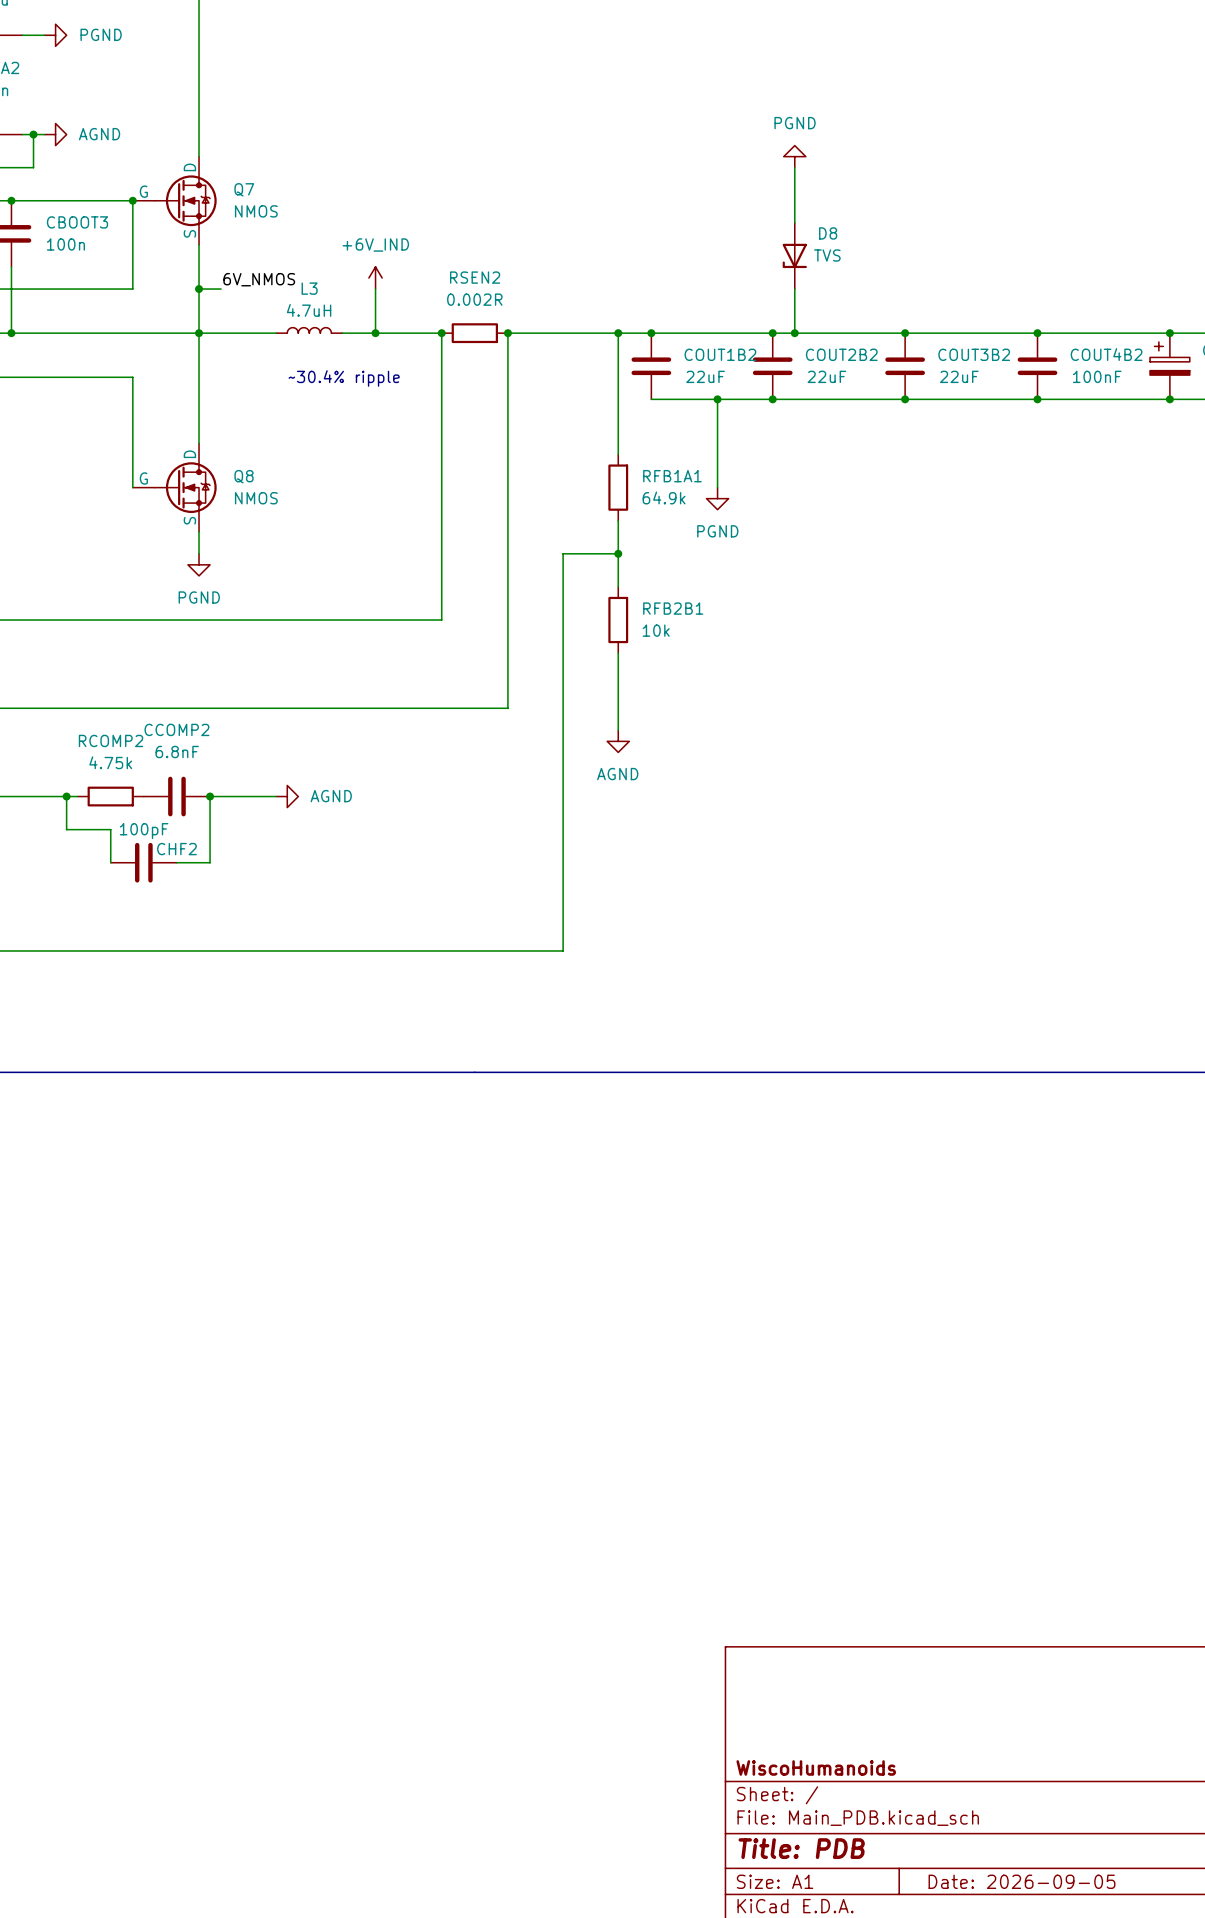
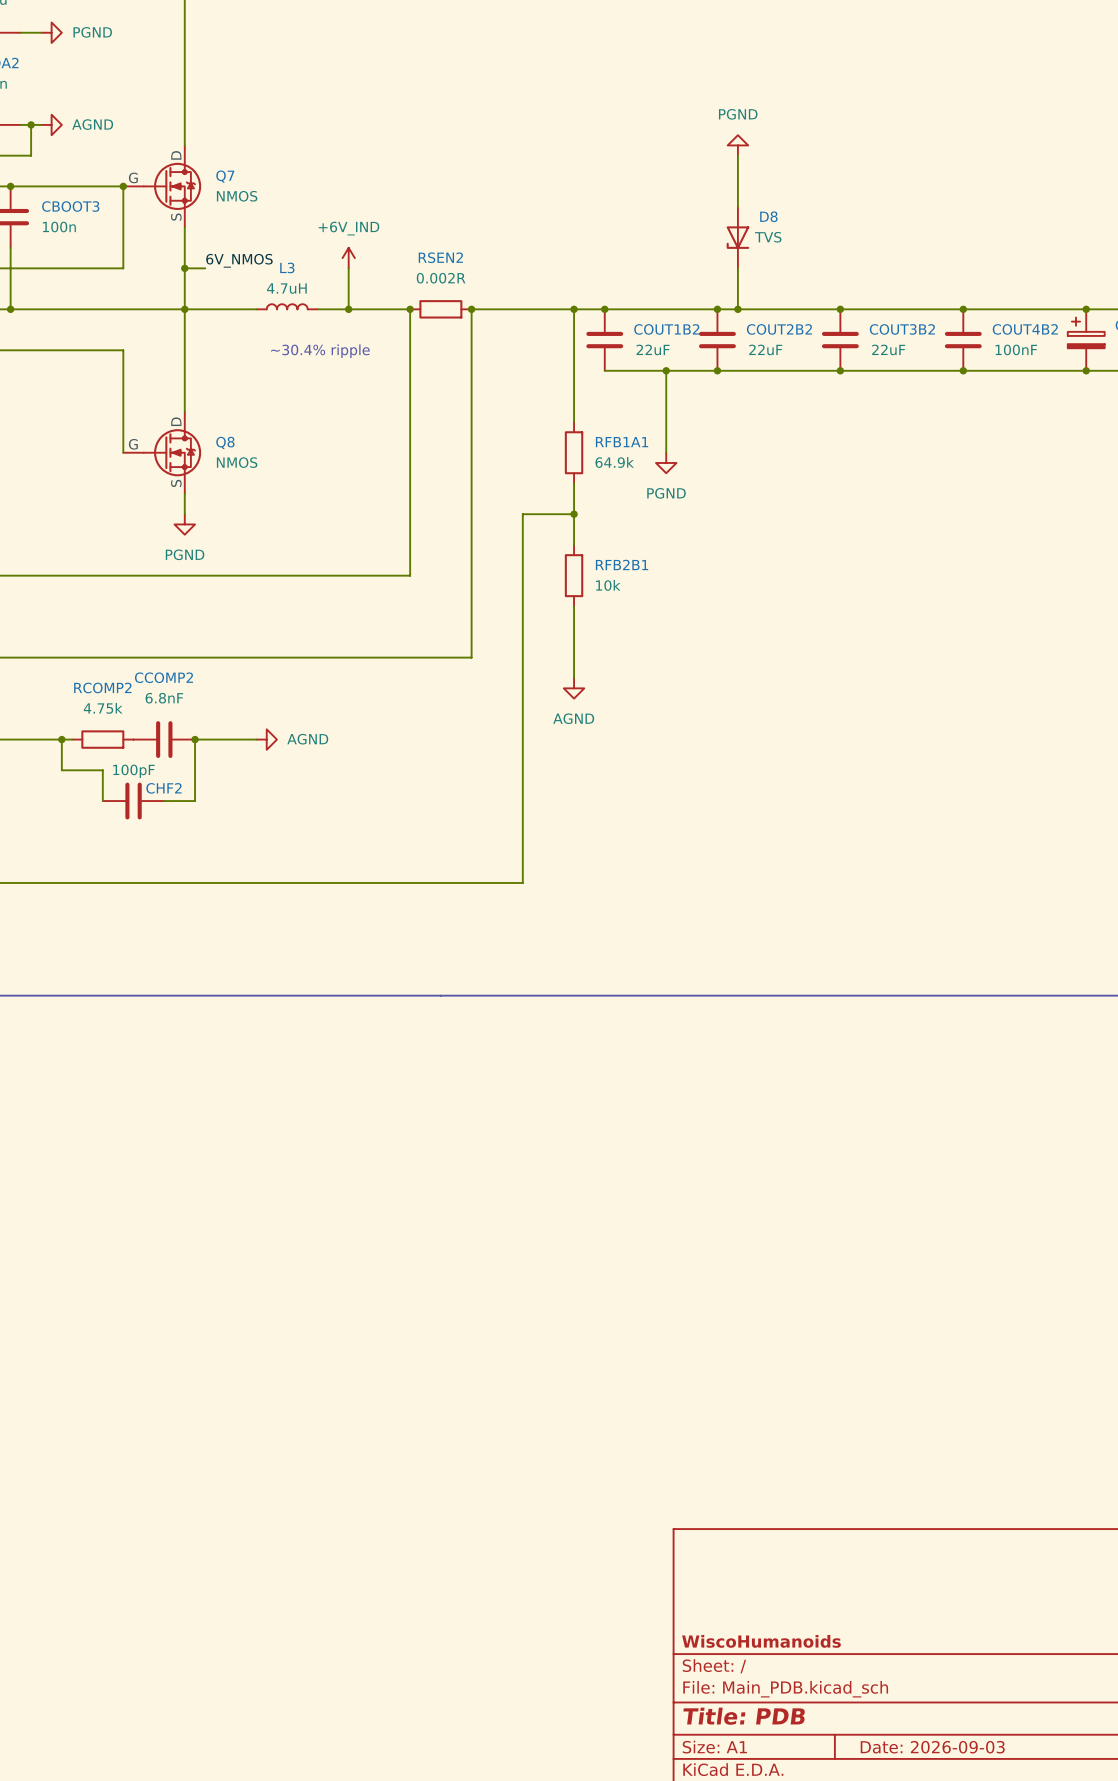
title block: Date: 2026-09-05 (1022, 1881) -> Date: 2026-09-03 (932, 1747)

